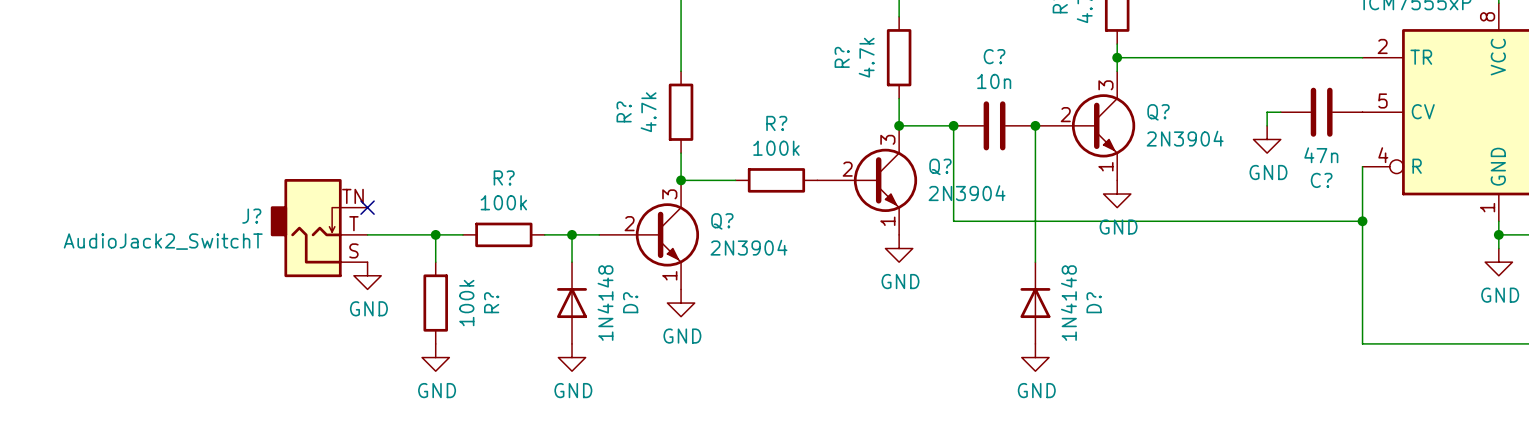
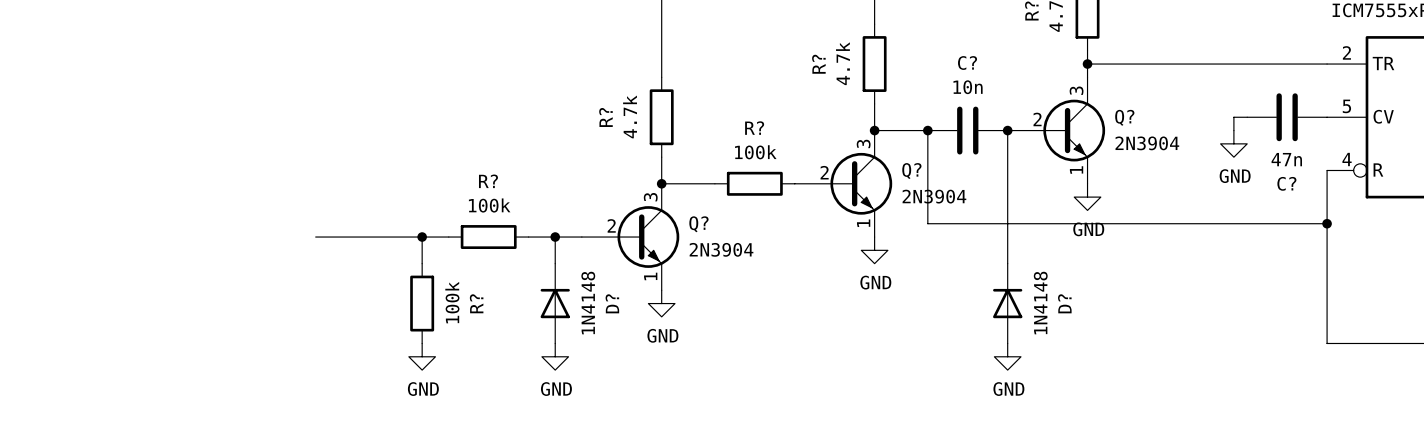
no-connect mark: (367, 207) -> none
J?: AudioJack2_SwitchT (319, 228) -> none
power symbol: GND (367, 275) -> none

